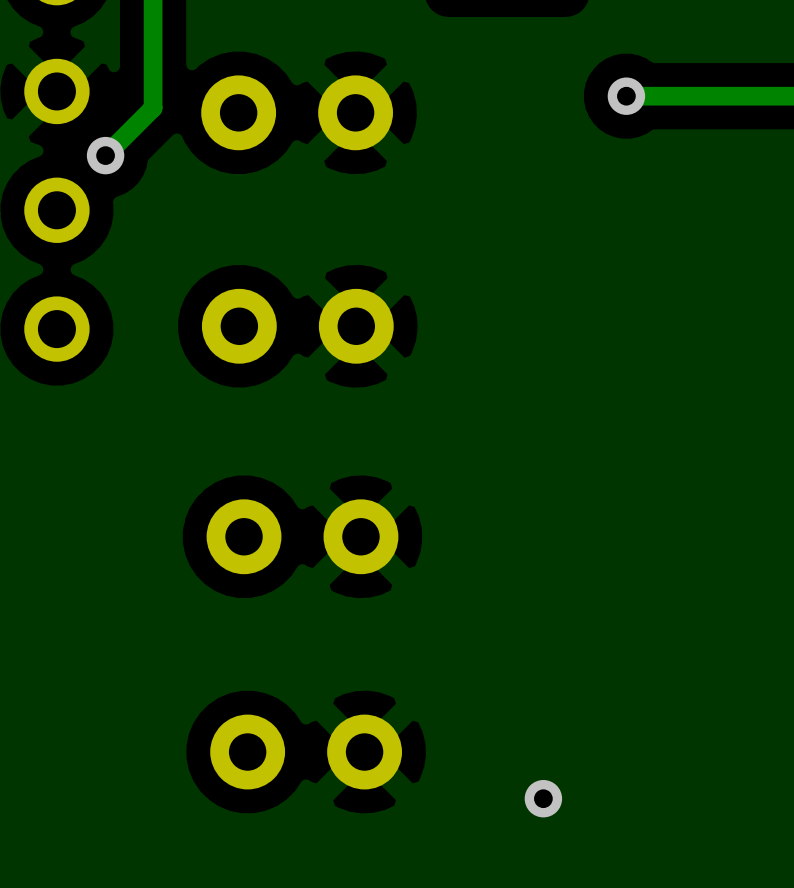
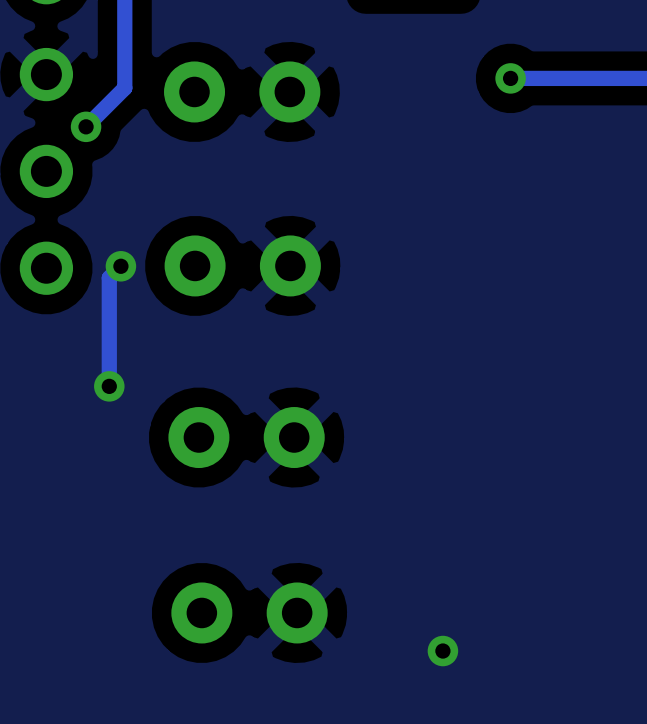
track: none -> (120, 266) (109, 277) (109, 386)
via: none -> (120, 266)
via: none -> (109, 386)

